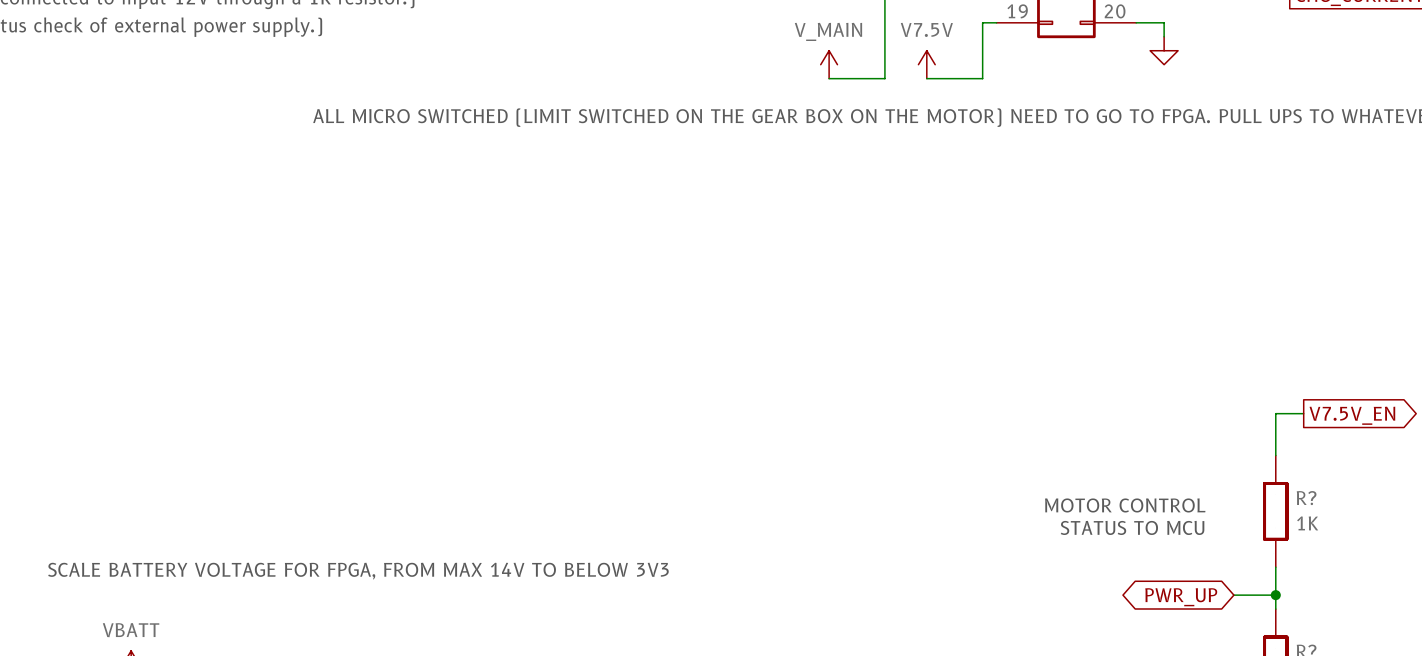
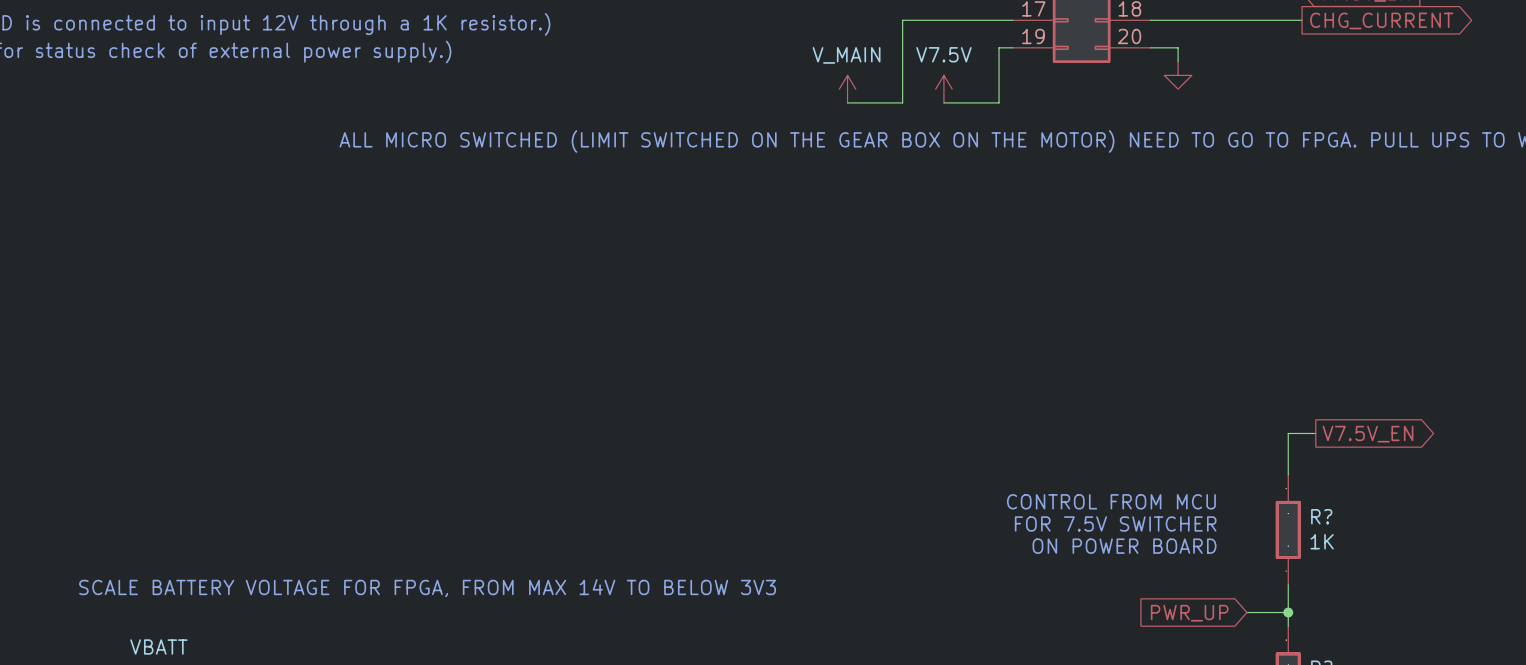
text: none -> CONTROL FROM MCU (1111, 501)
text: MOTOR CONTROL (1125, 505) -> FOR 7.5V SWITCHER (1115, 523)
text: STATUS TO MCU (1132, 527) -> ON POWER BOARD (1124, 546)
global label shape: bidirectional (1181, 597) -> input (1189, 613)

